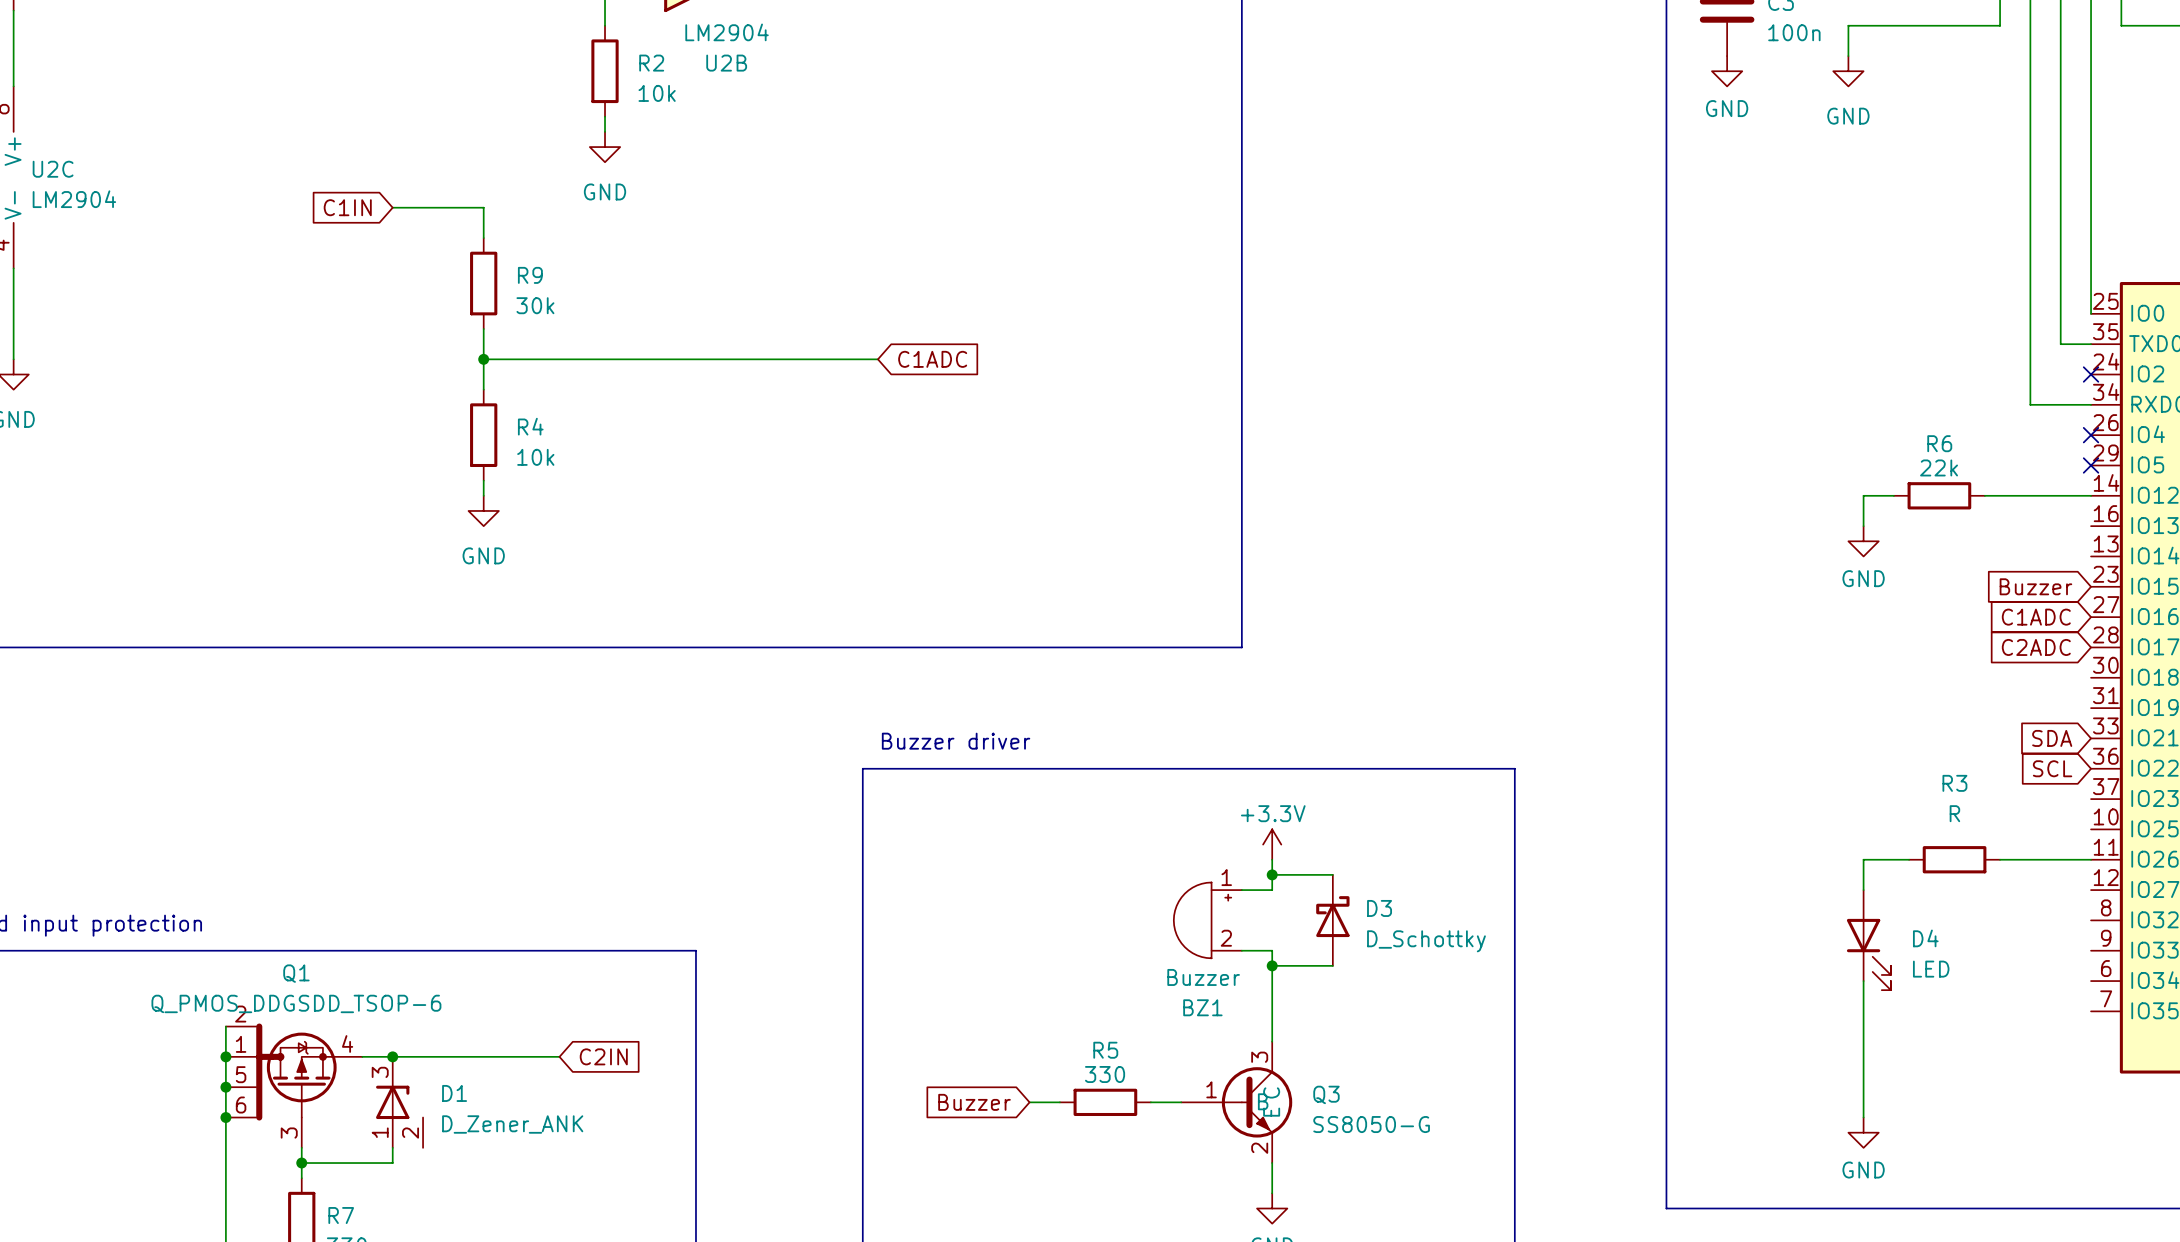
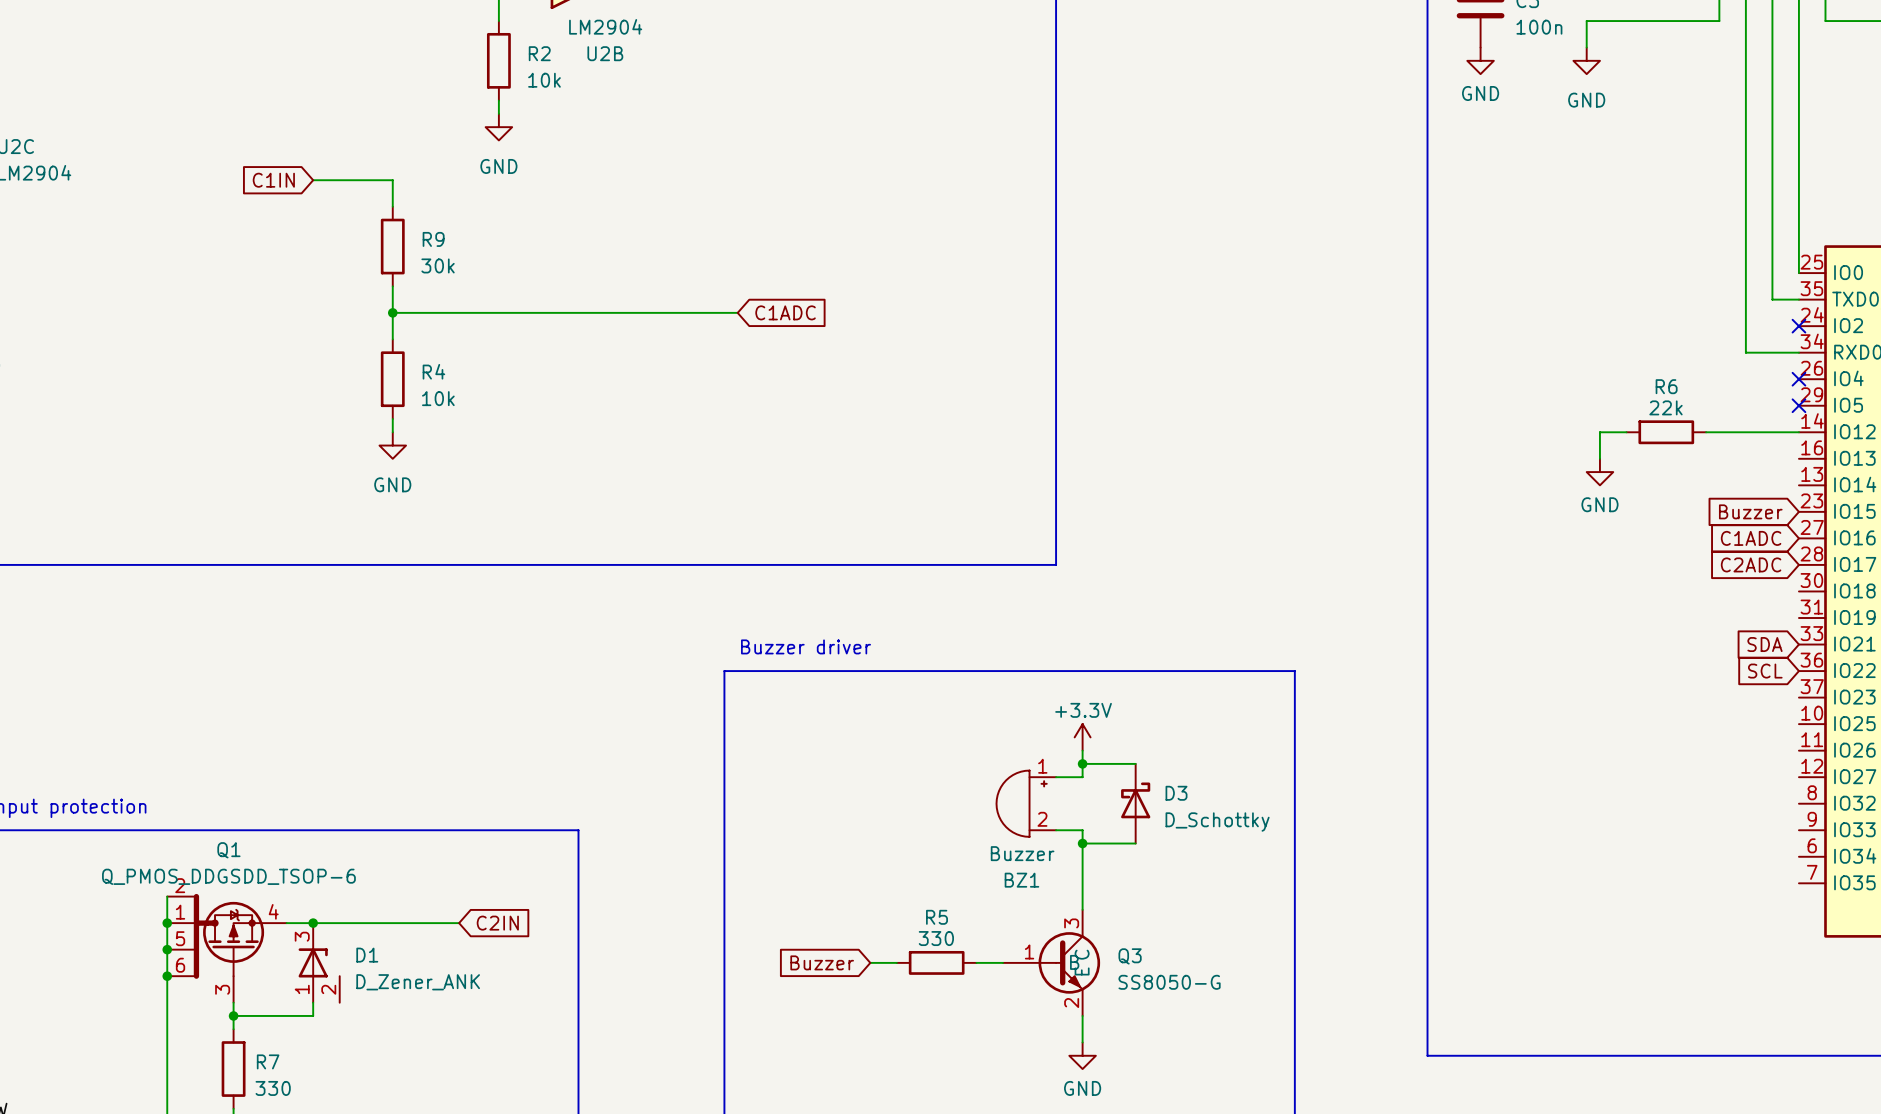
wire: (1909, 859) (1863, 859) (1863, 890) -> none
R3: R (1954, 859) -> none
wire: (2000, 859) (2091, 859) -> none
D4: LED (1868, 940) -> none
wire: (1863, 981) (1863, 1117) -> none
power symbol: GND (1863, 1132) -> none

